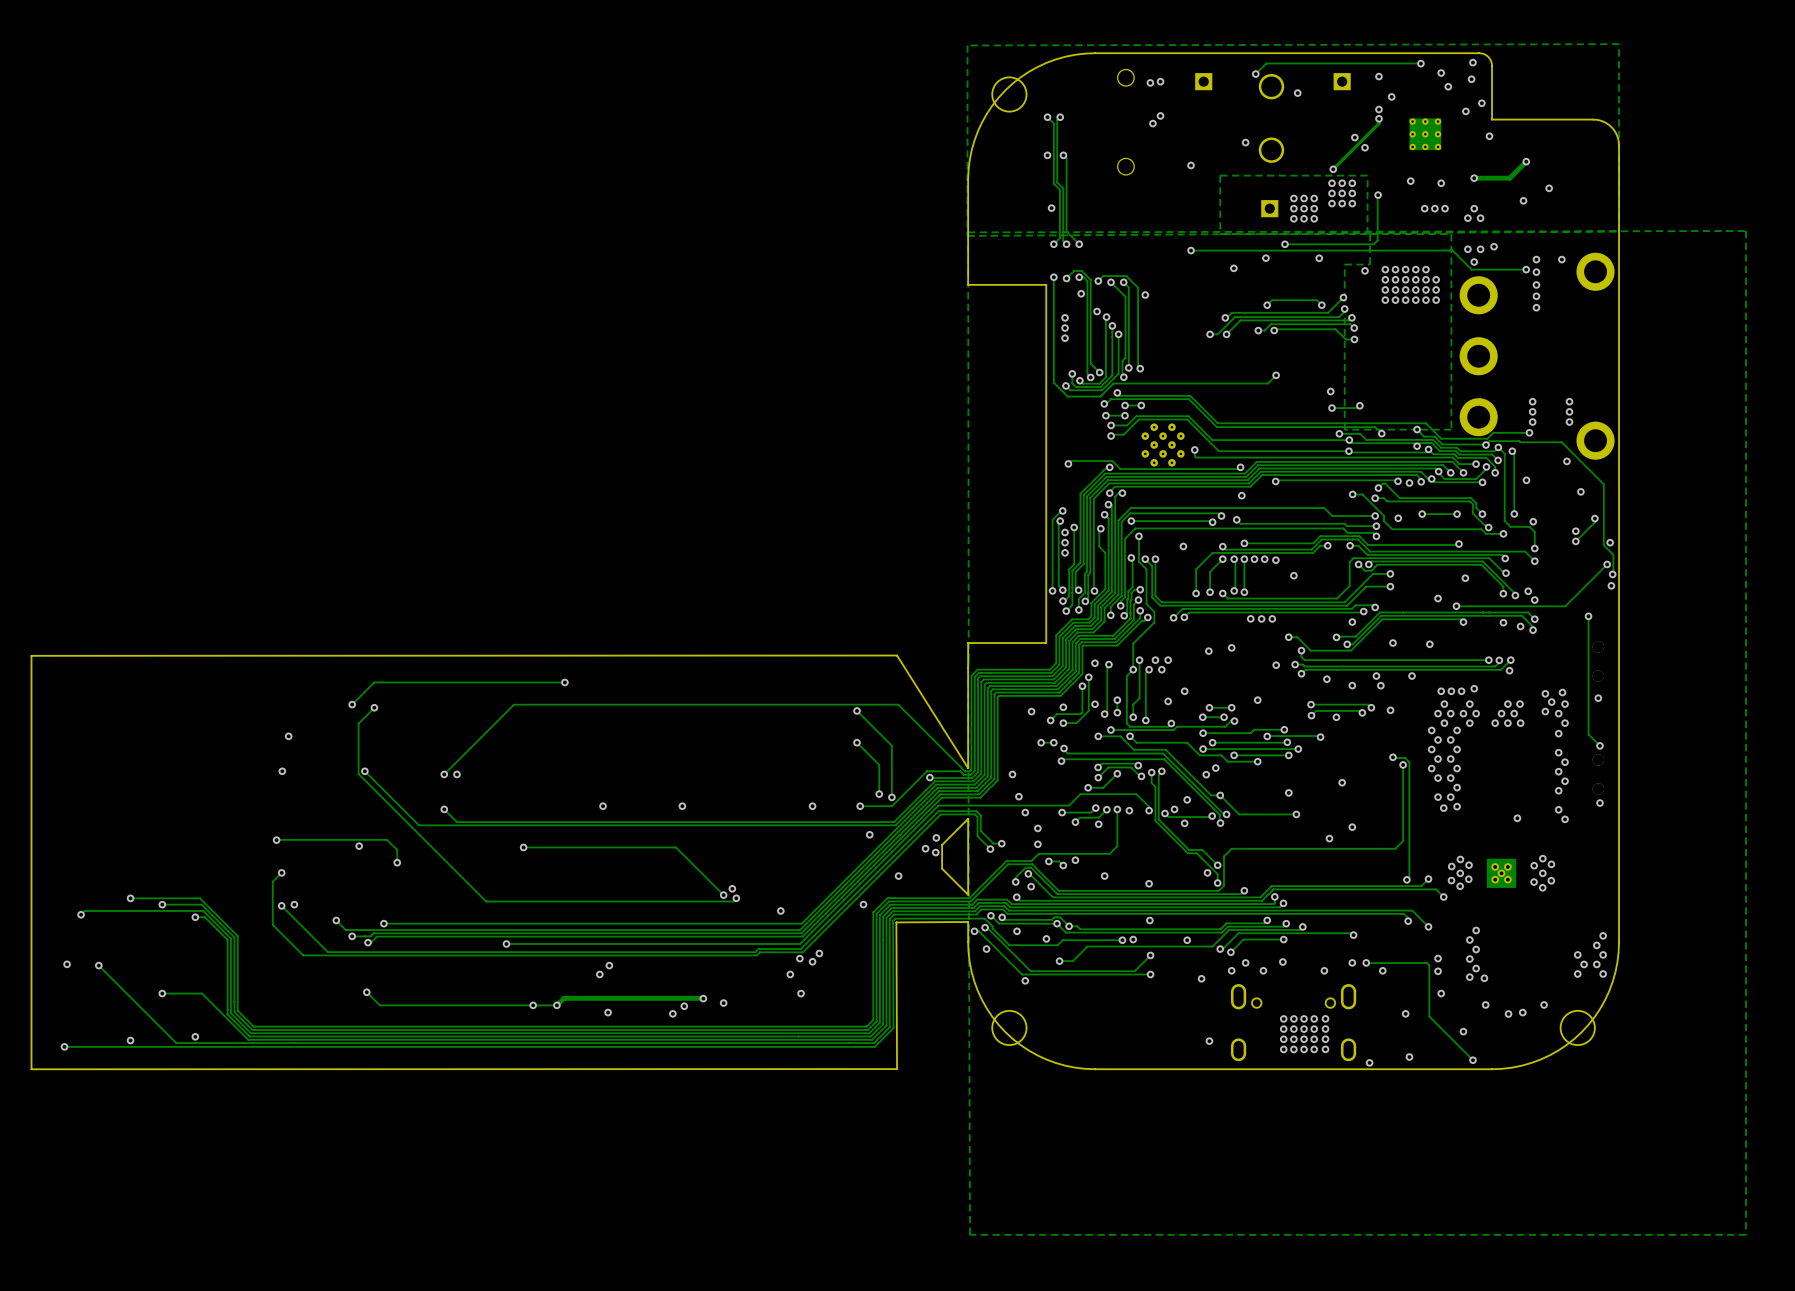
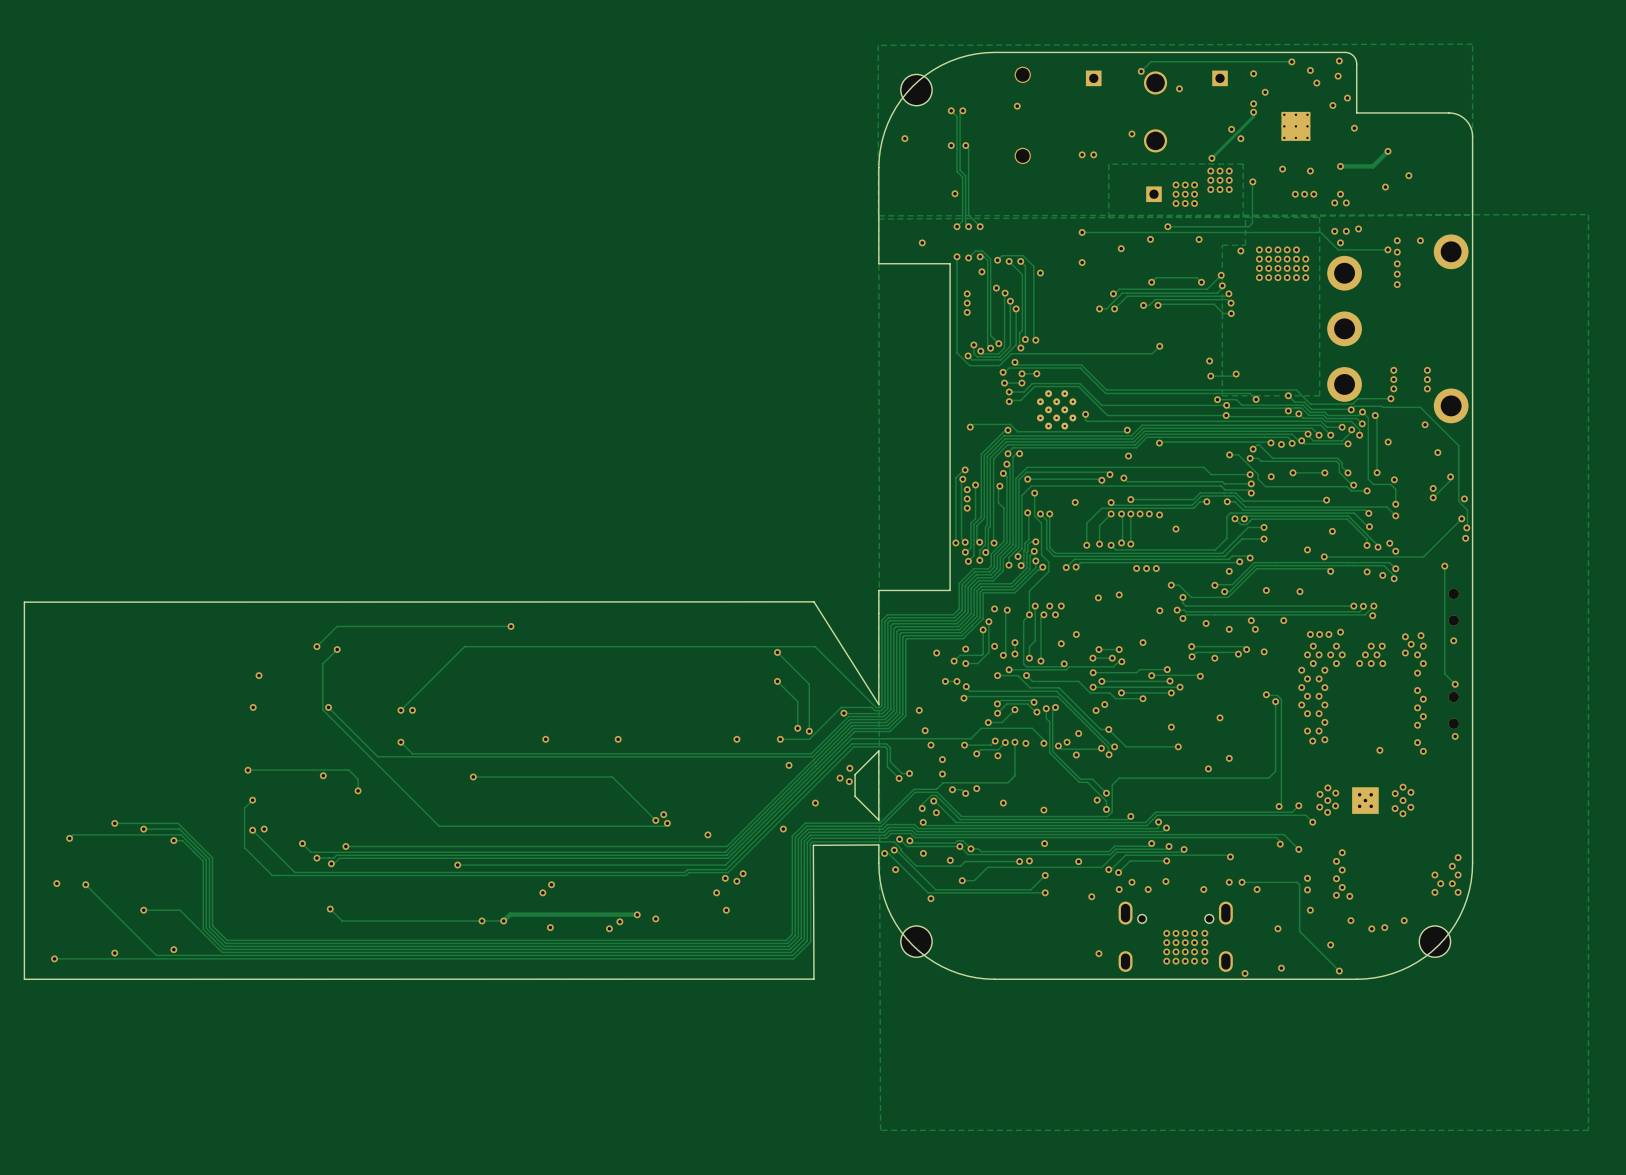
via: (1160, 81) -> none
via: (1150, 82) -> none
via: none -> (1017, 106)
via: (1160, 115) -> none
via: (1152, 123) -> none
via: none -> (904, 138)
via: none -> (1093, 154)
via: none -> (922, 242)
via: none -> (1082, 262)

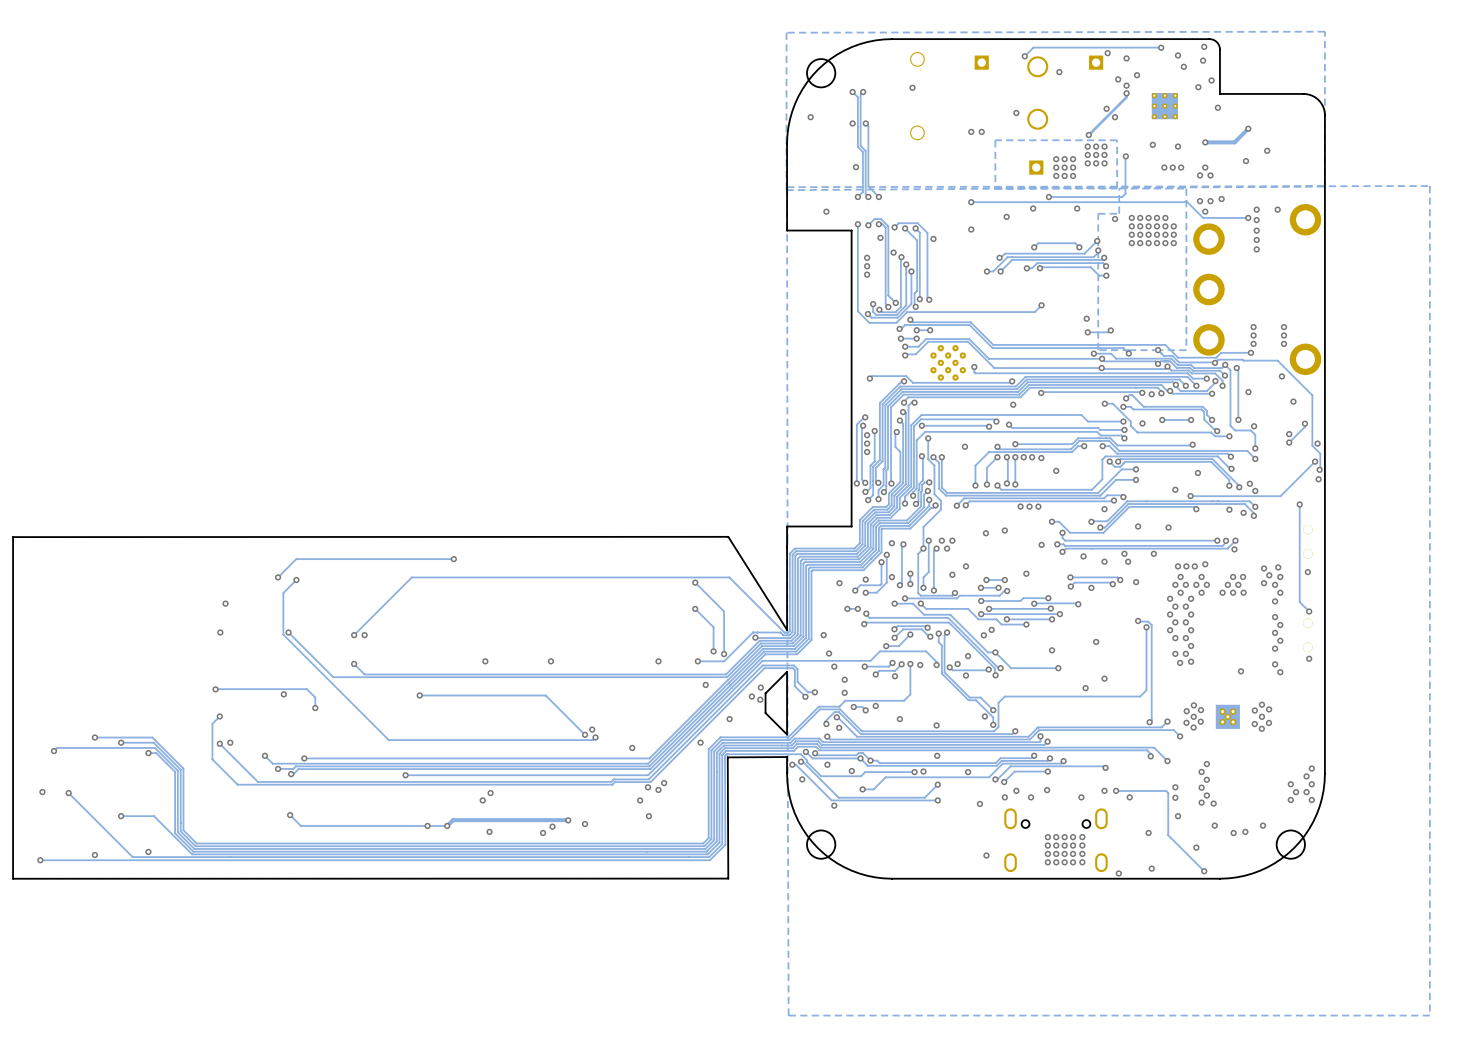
via: none -> (1107, 53)
via: none -> (1118, 79)

